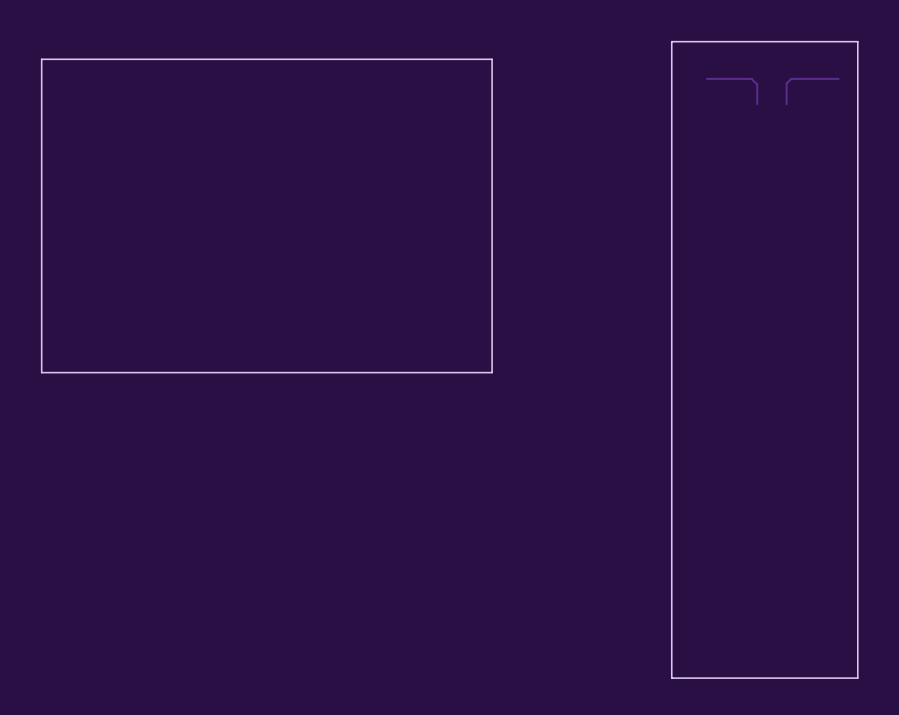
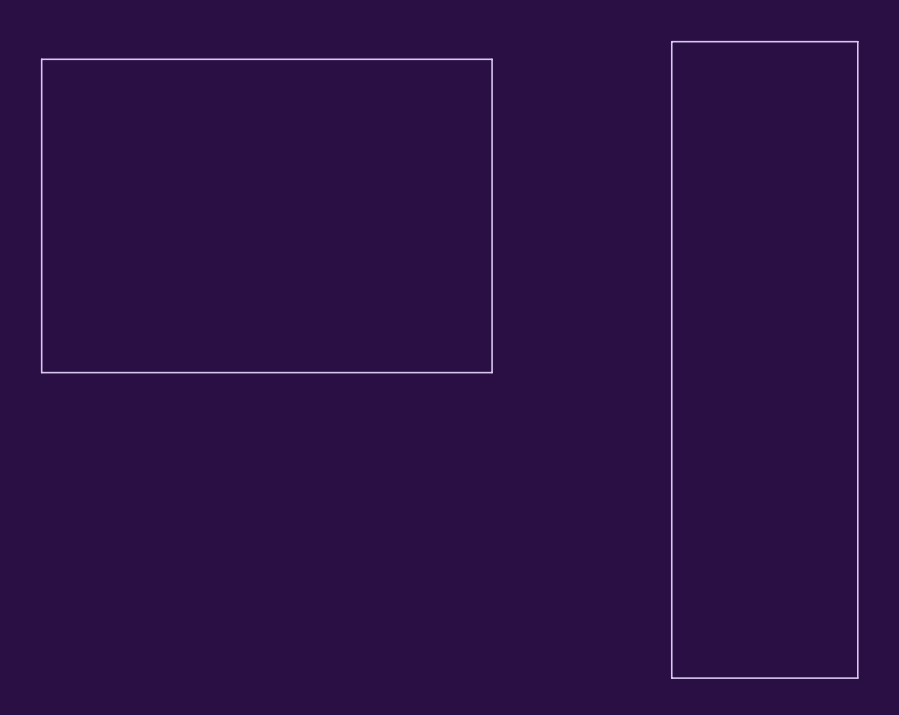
track: (707, 78) (751, 78) (757, 84) (757, 104) -> none
track: (838, 78) (791, 78) (786, 83) (786, 104) -> none

